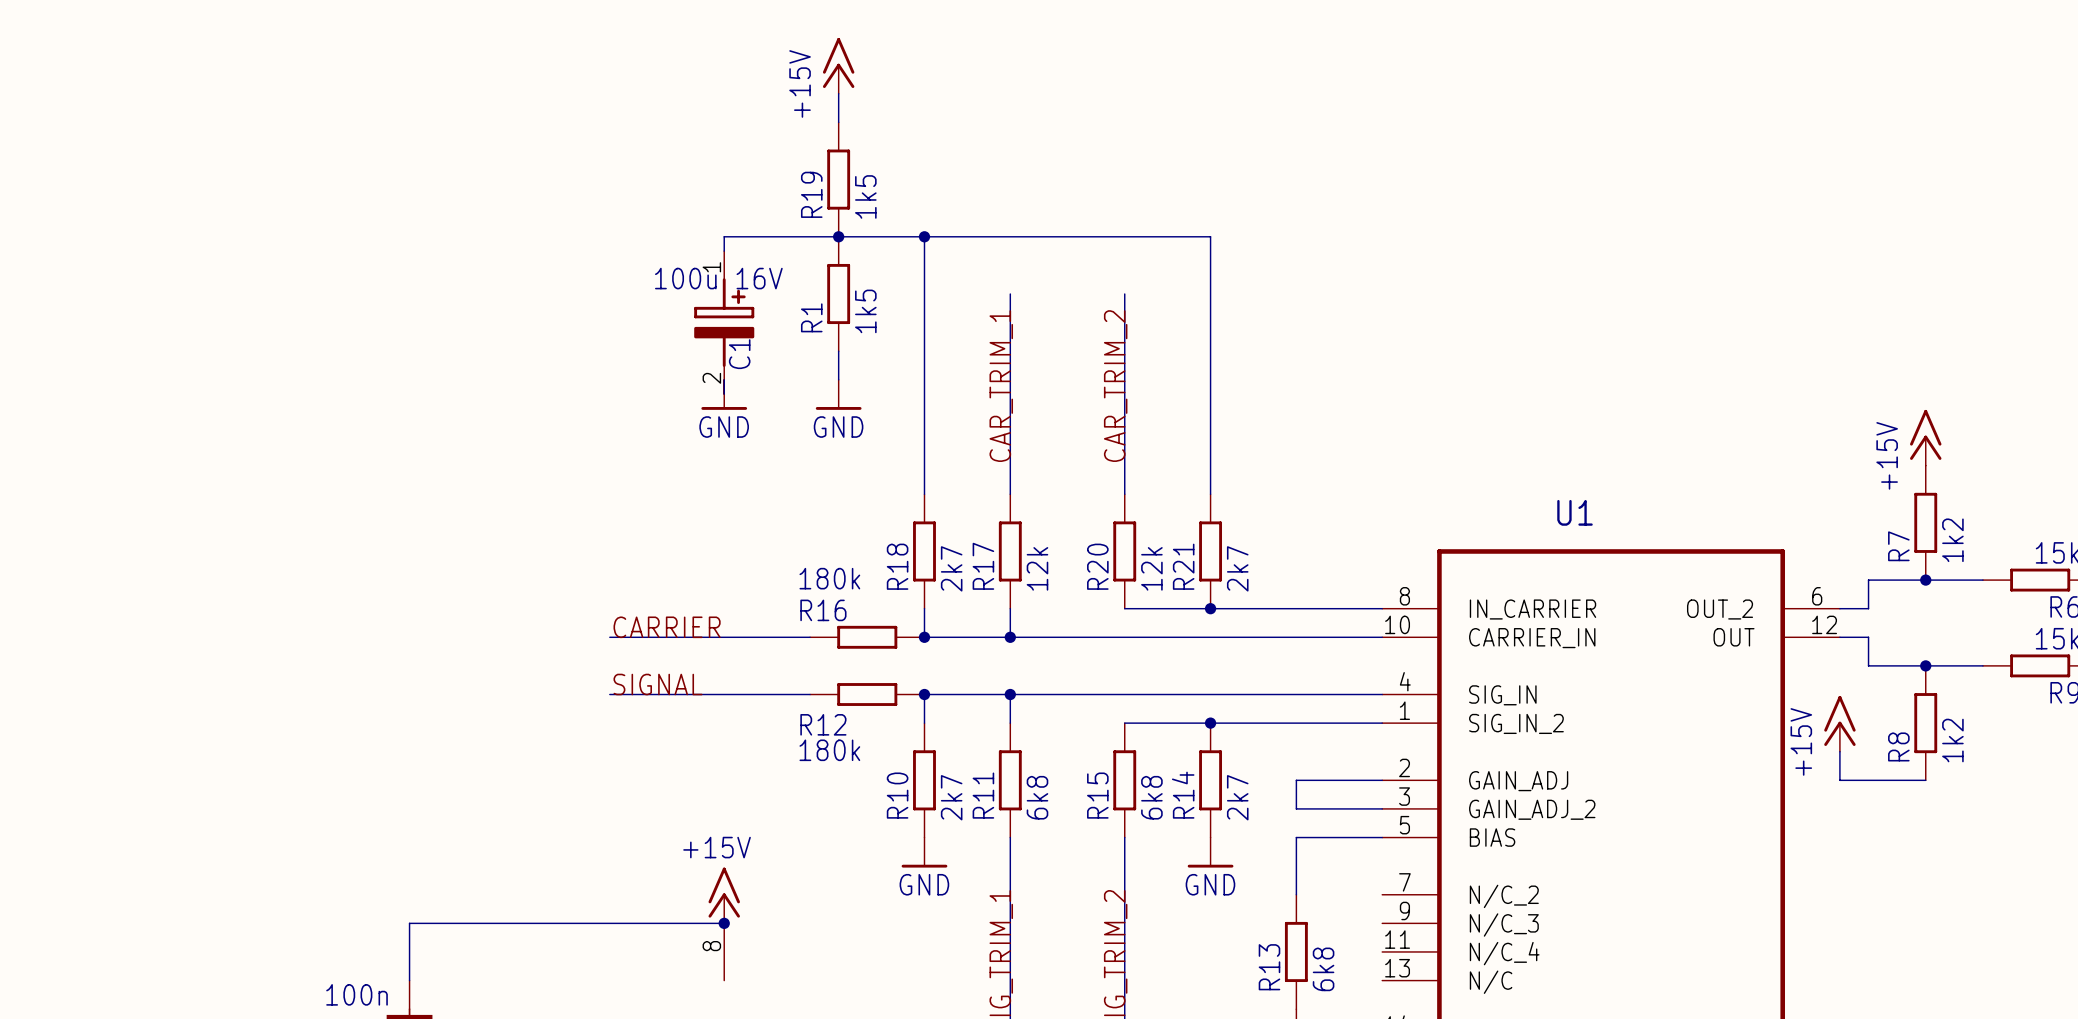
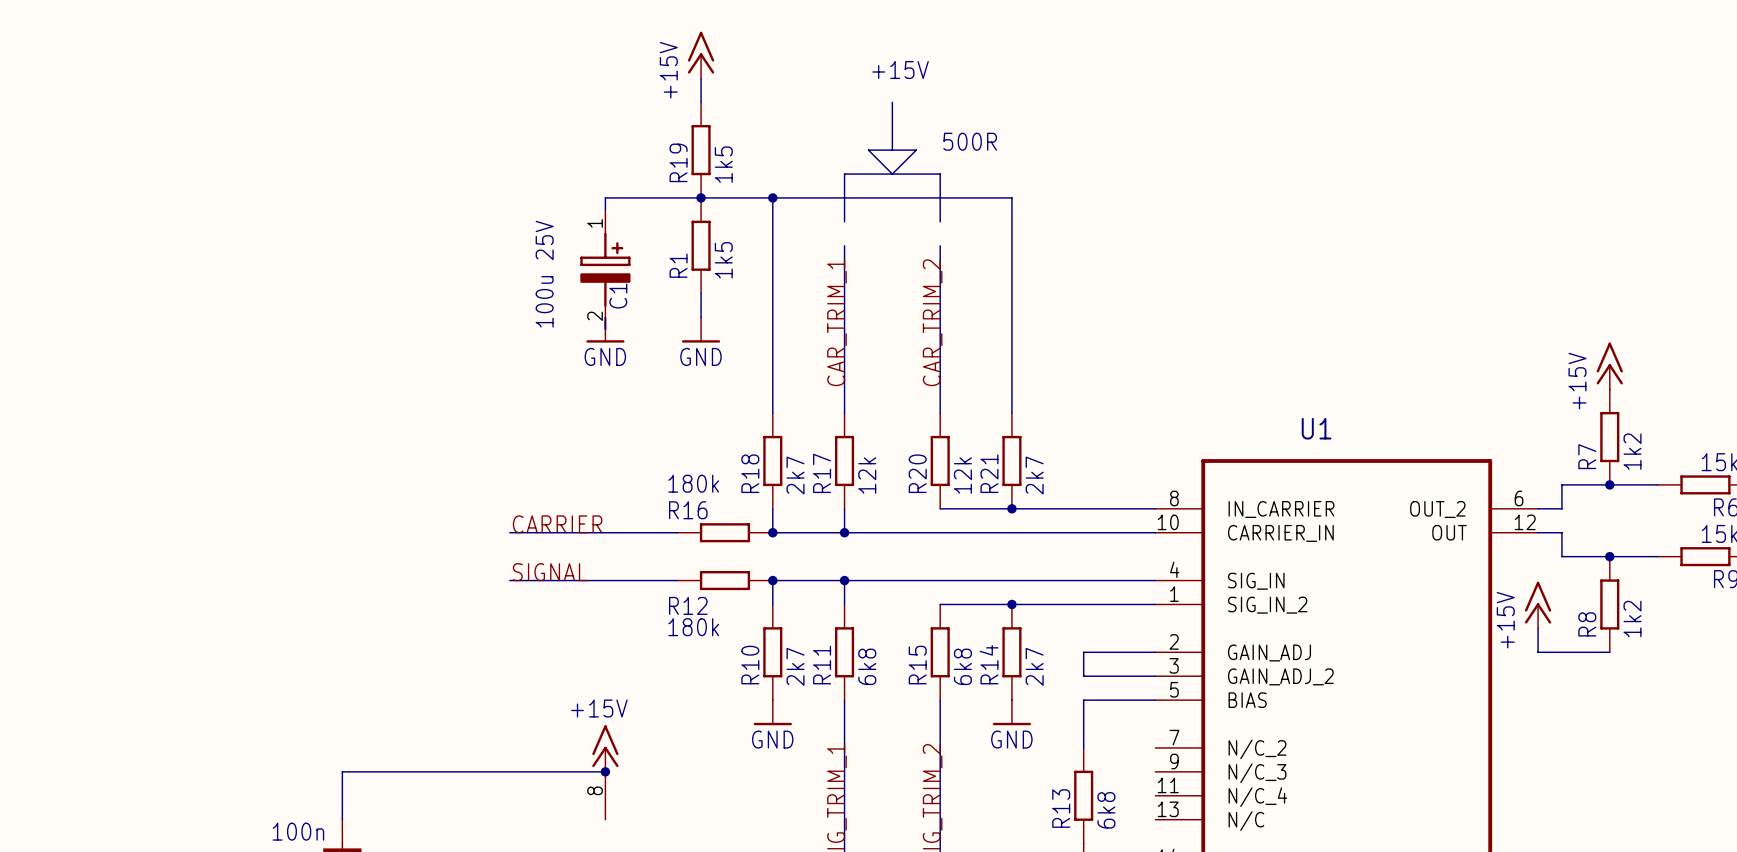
text: none -> +15V (900, 70)
line: none -> (892, 102) (892, 150)
text: none -> 500R (970, 141)
line: none -> (868, 150) (892, 174) (916, 150) (868, 150)
line: none -> (844, 221) (844, 174) (940, 174) (940, 221)
C1 value: 100u 16V (718, 278) -> 100u 25V (544, 274)

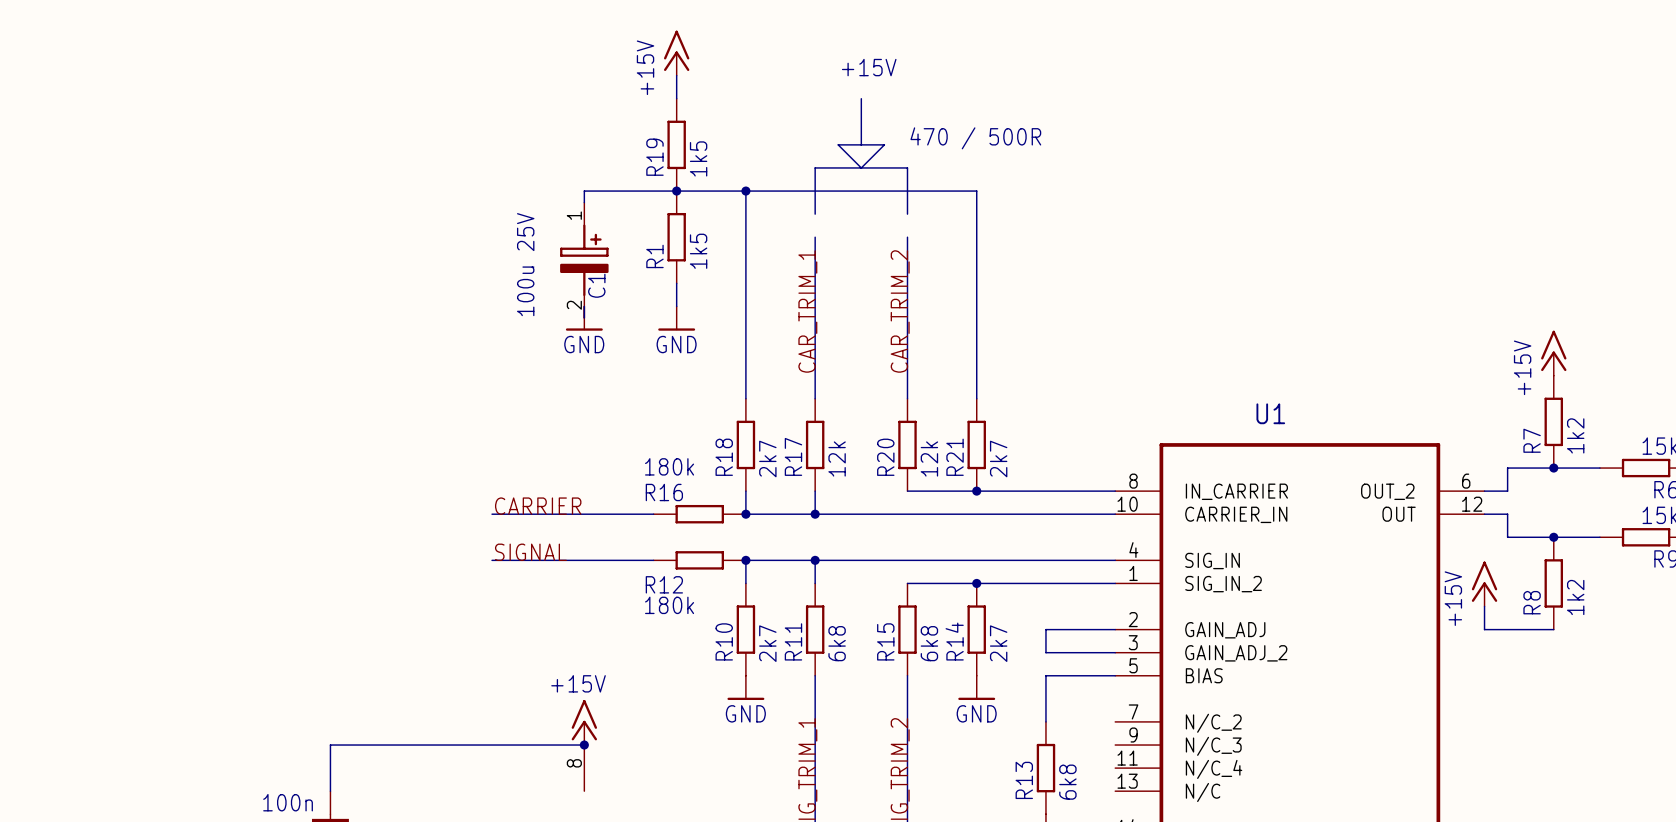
text: 500R (970, 141) -> 470 / 500R (975, 138)

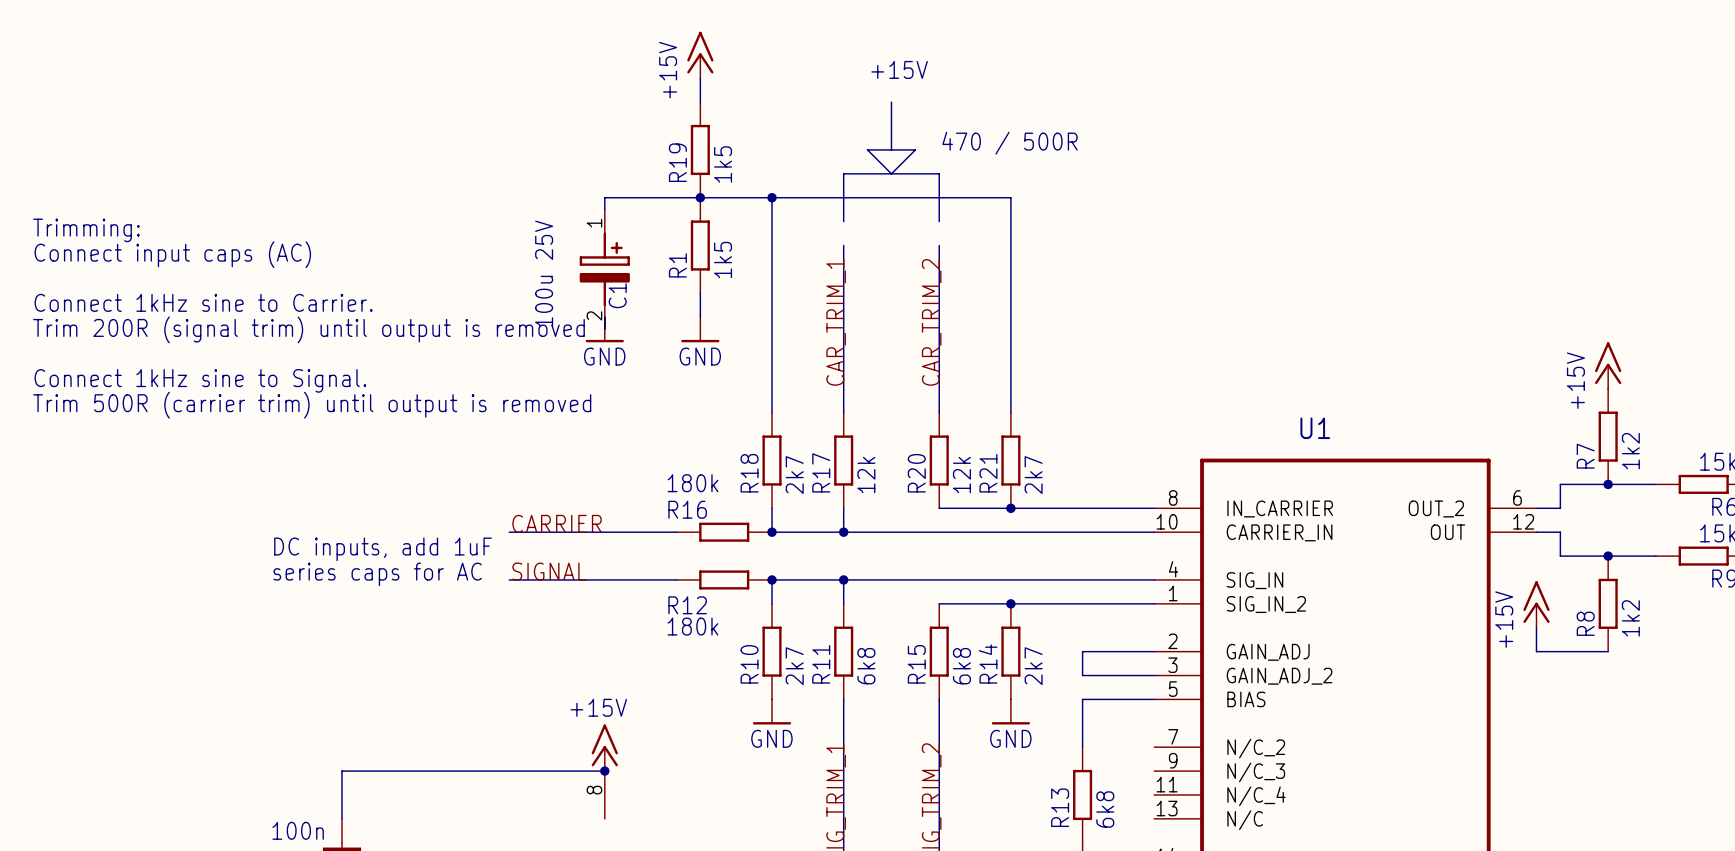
text: none -> Trimming: (86, 230)
text: none -> Connect input caps (AC) (172, 254)
text: none -> Connect 1kHz sine to Carrier. (203, 302)
text: none -> Trim 200R (signal trim) until output is removed (308, 329)
text: none -> Connect 1kHz sine to Signal. (200, 380)
text: none -> Trim 500R (carrier trim) until output is removed (312, 405)
text: none -> DC inputs, add 1uF (383, 549)
text: none -> series caps for AC (377, 574)

